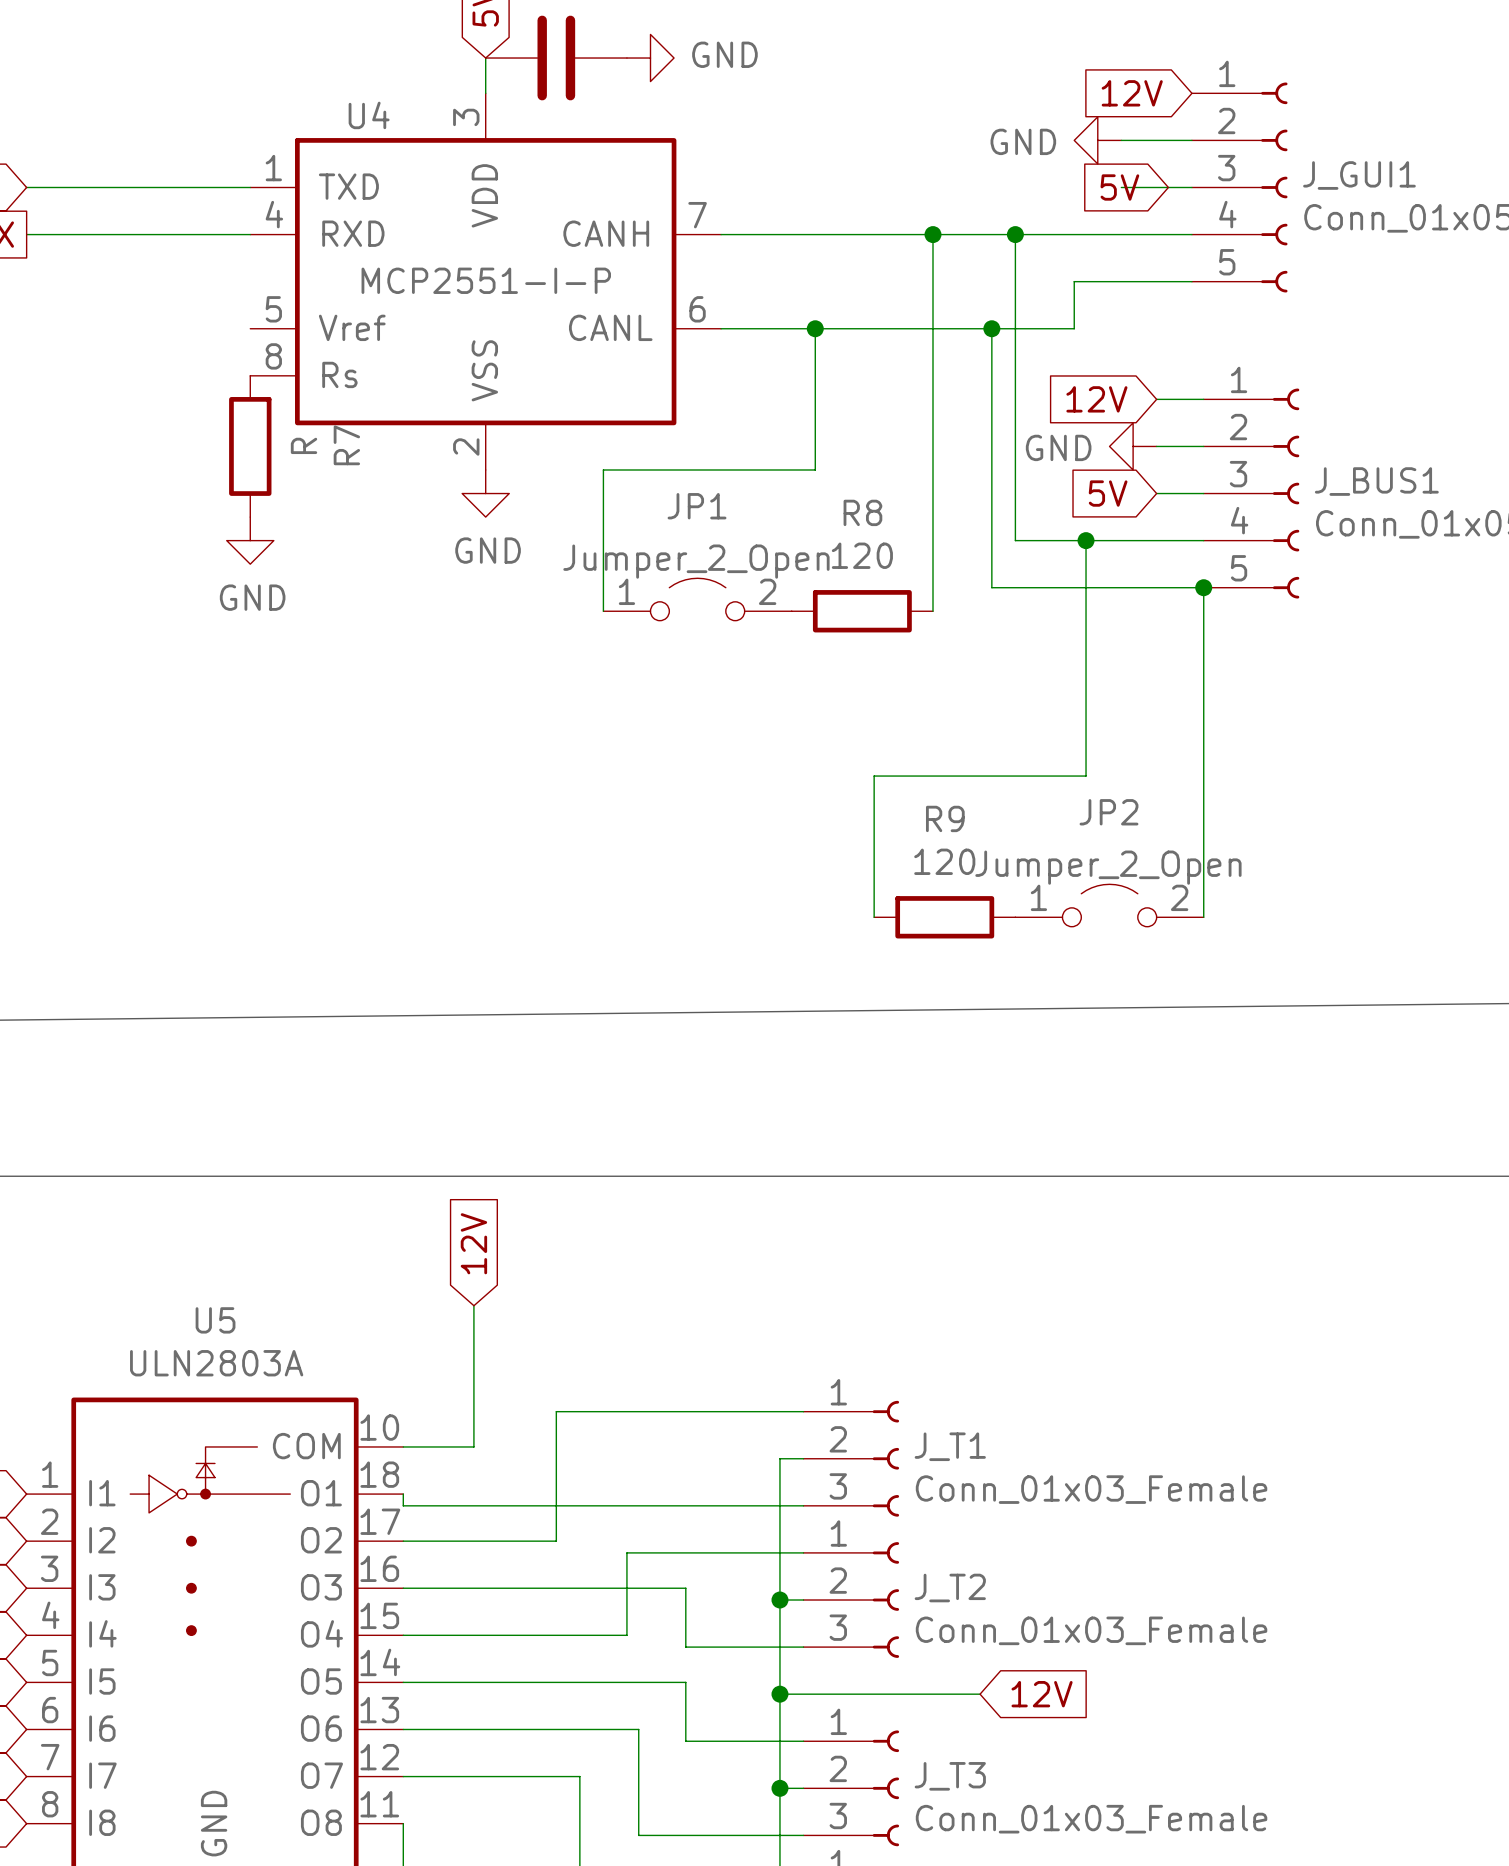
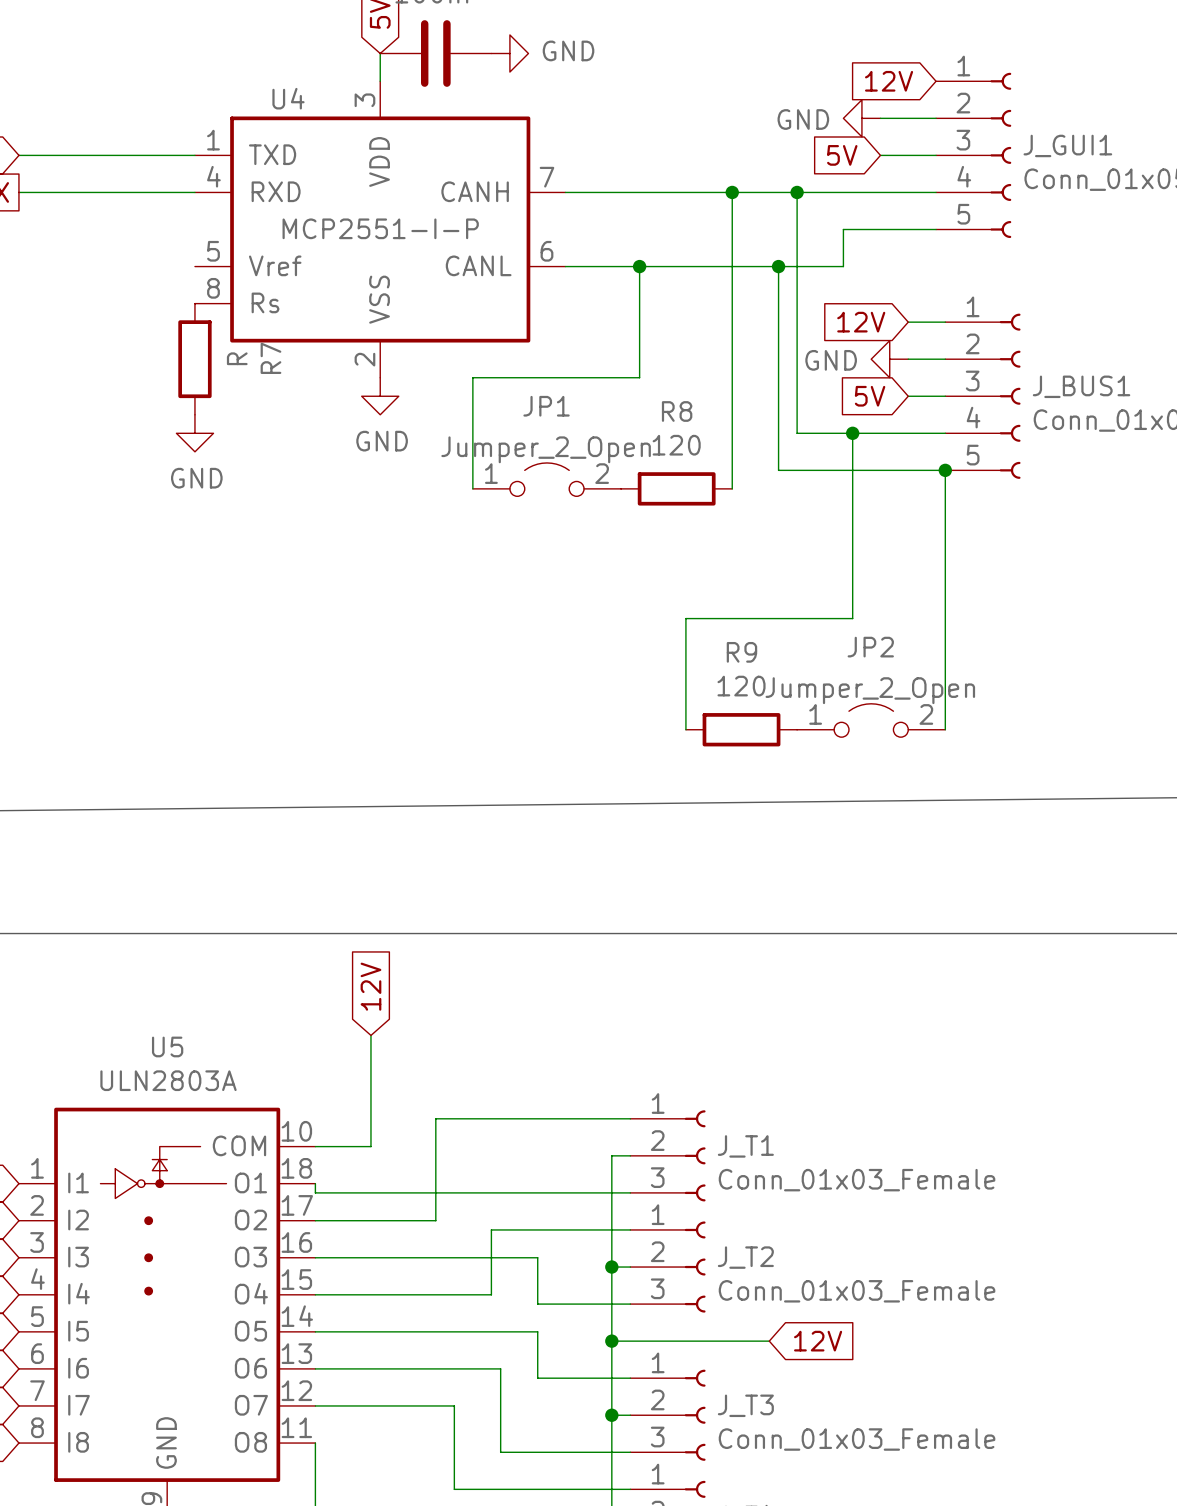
global label position: 5V (1119, 187) -> 5V (842, 155)

